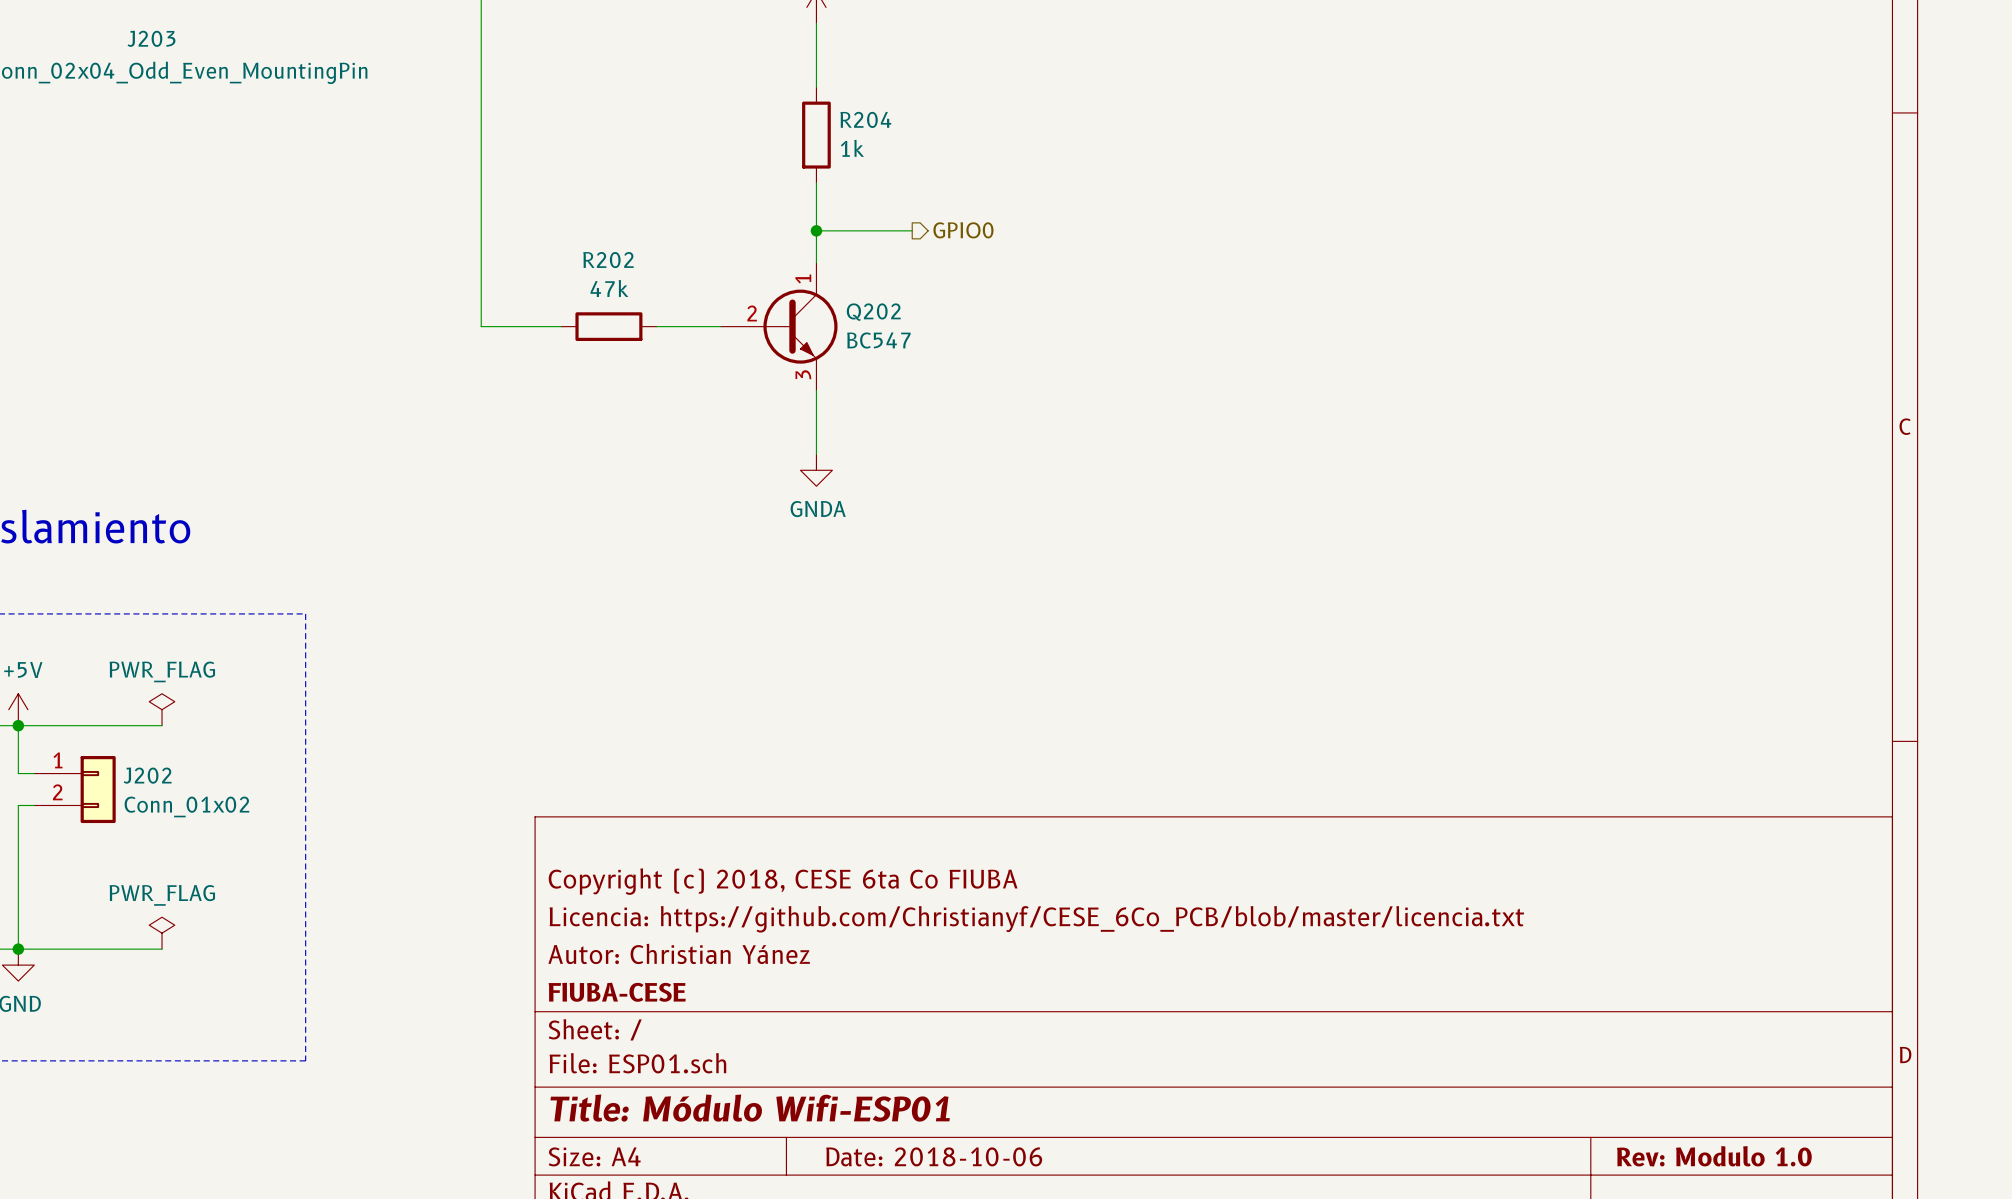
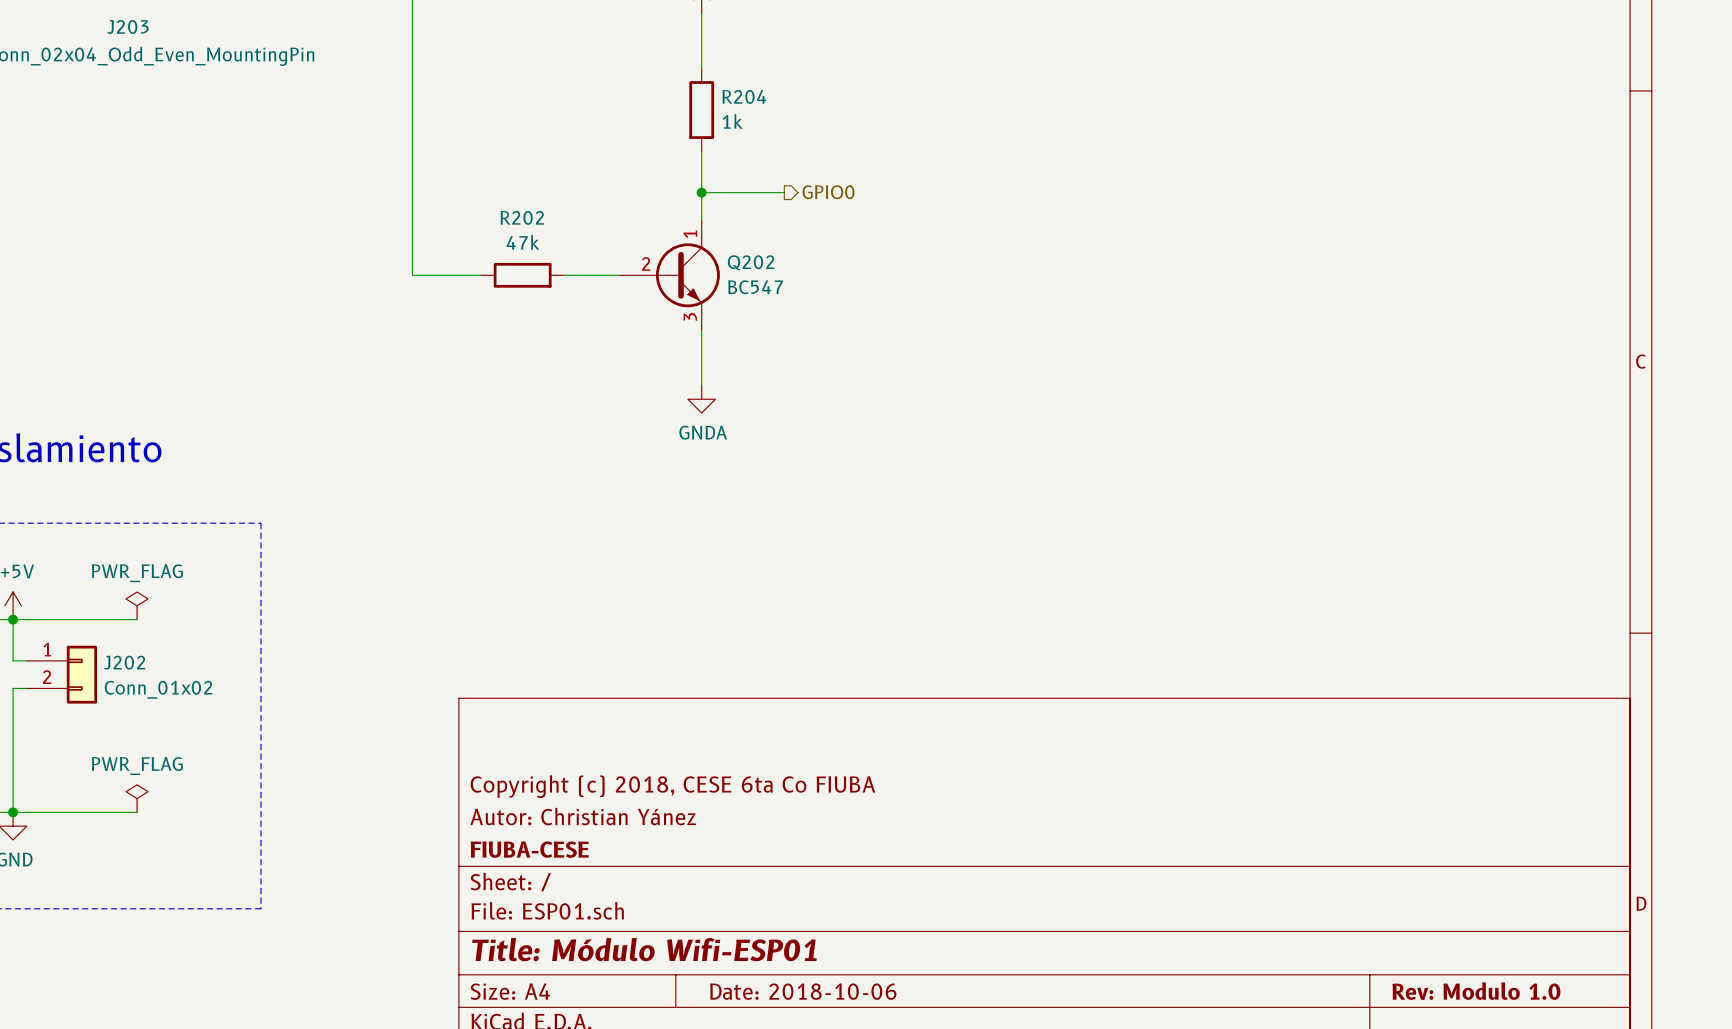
title block: Copyright (c) 2018, CESE 6ta Co FIUBA (783, 881) -> none
title block: Licencia: https://github.com/Christianyf/CESE_6Co_PCB/blob/master/licencia.txt (1036, 919) -> Copyright (c) 2018, CESE 6ta Co FIUBA (672, 786)

